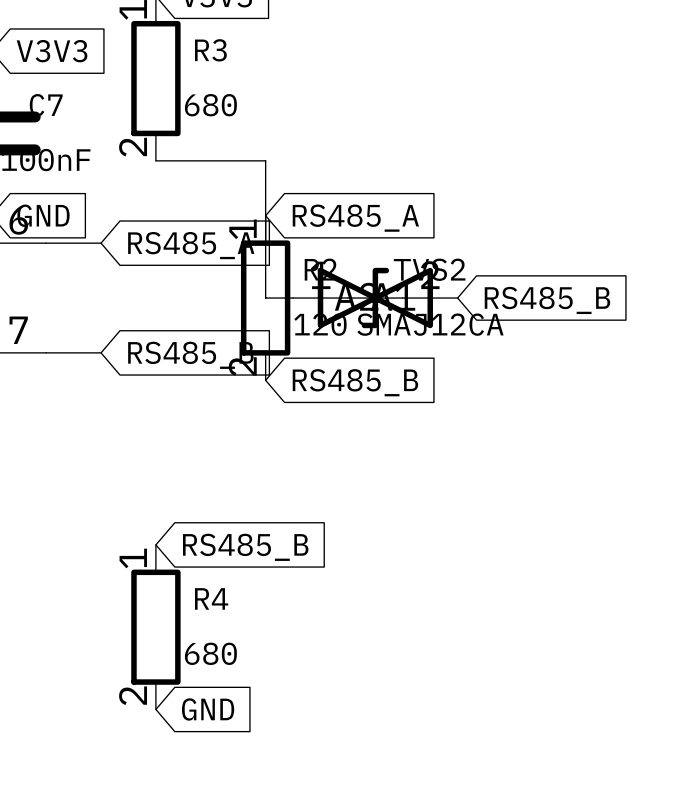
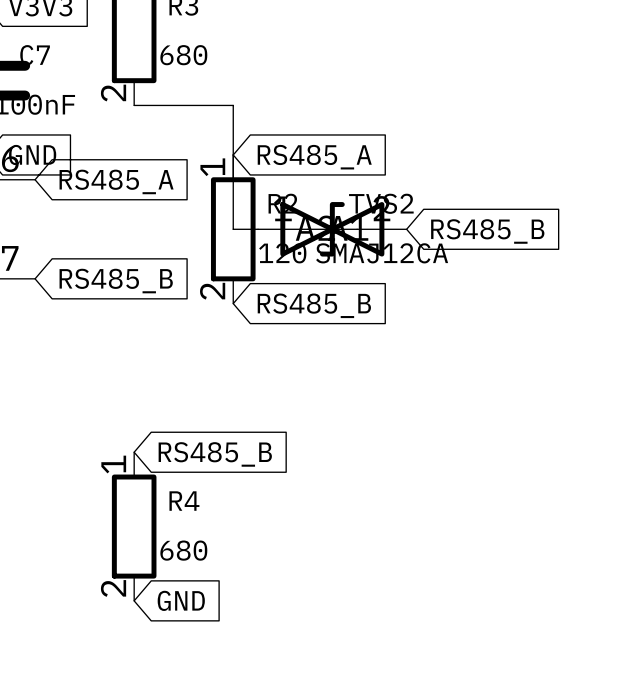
wire: (46, 243) (101, 243) -> none
global label position: RS485_A (191, 245) -> RS485_A (116, 181)
wire: (46, 352) (101, 352) -> none
global label position: RS485_B (190, 355) -> RS485_B (116, 281)

